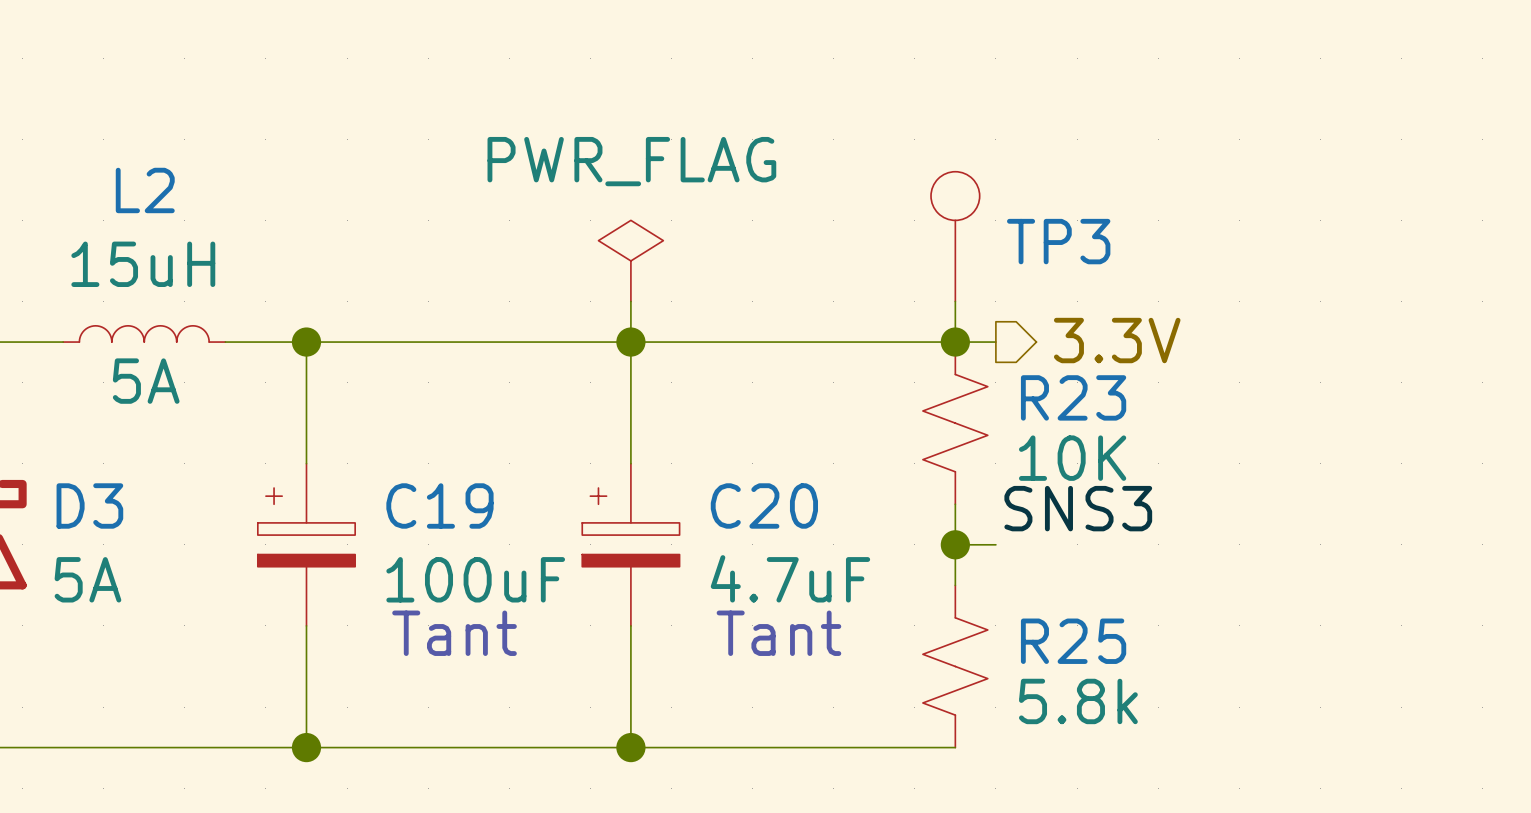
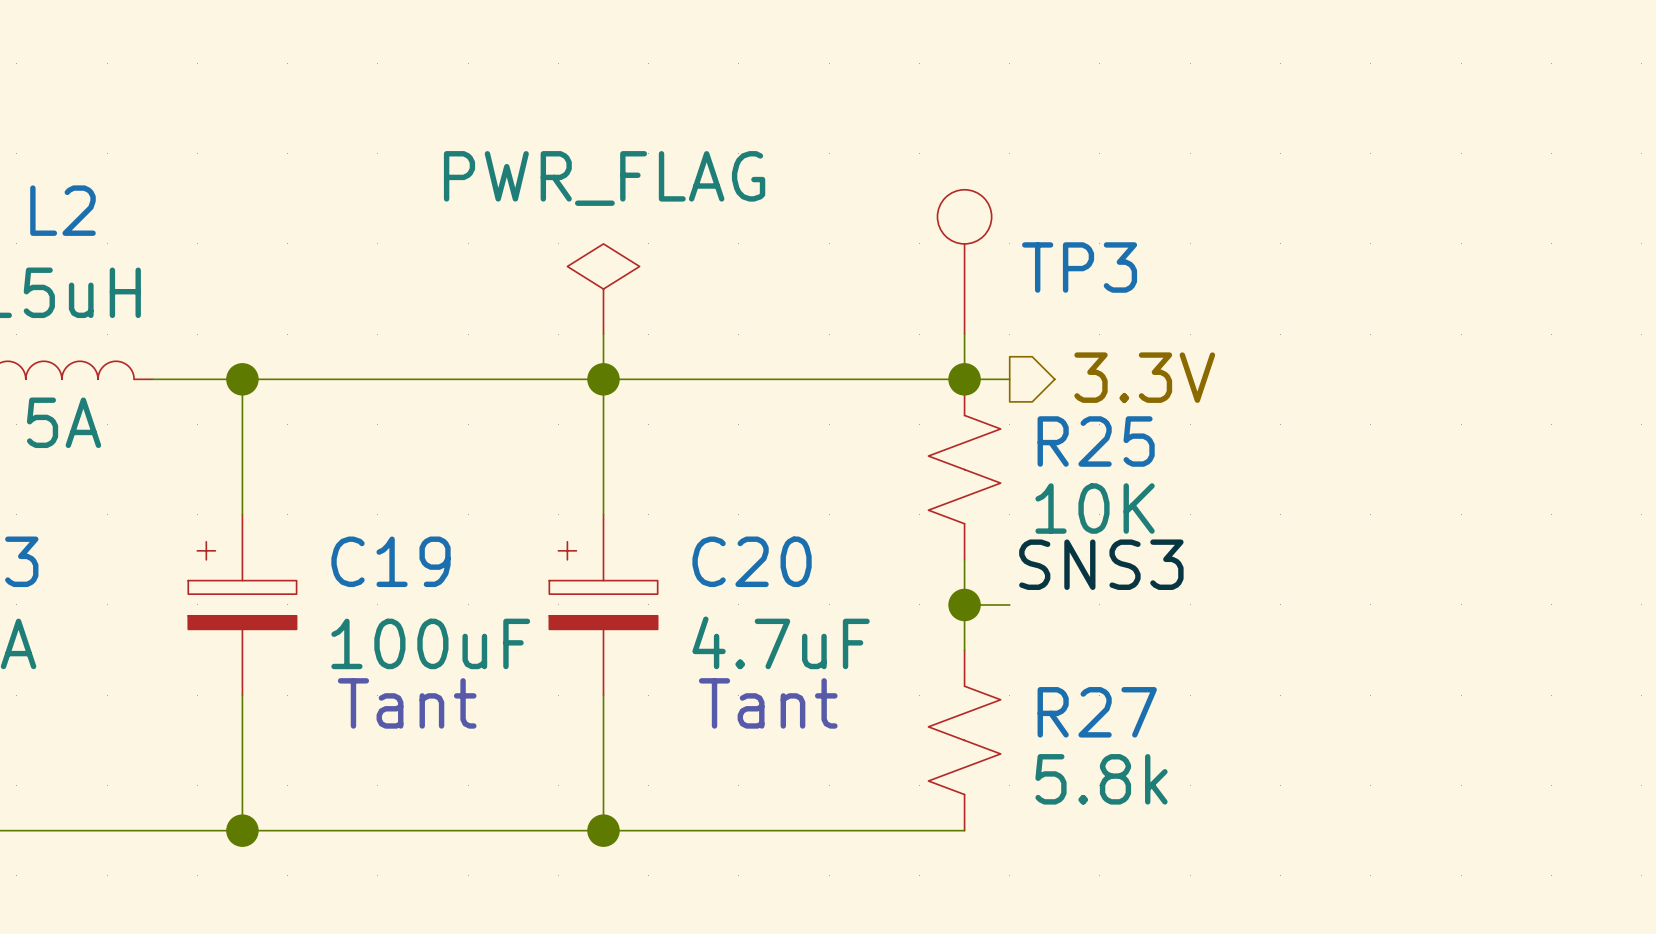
R23 name: R23 (1073, 397) -> R25 (1096, 441)
R25 name: R25 (1073, 641) -> R27 (1097, 712)

